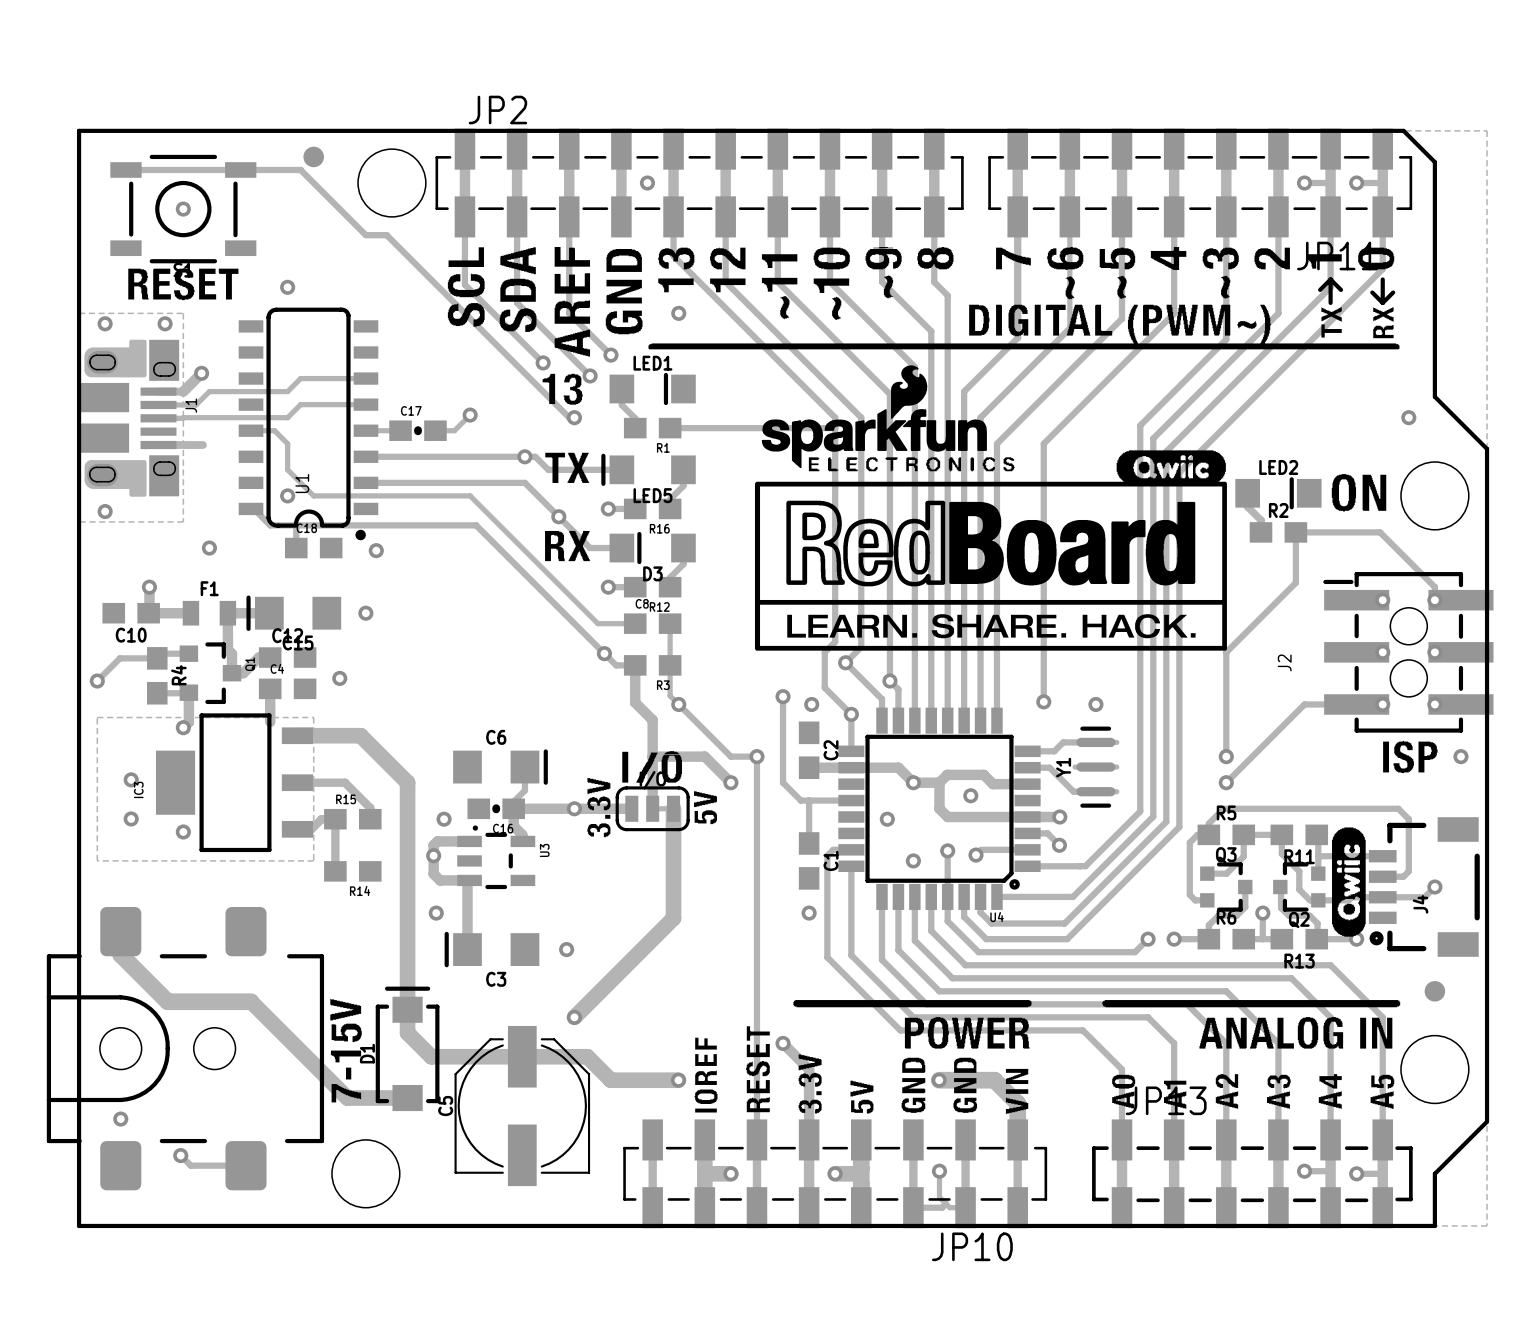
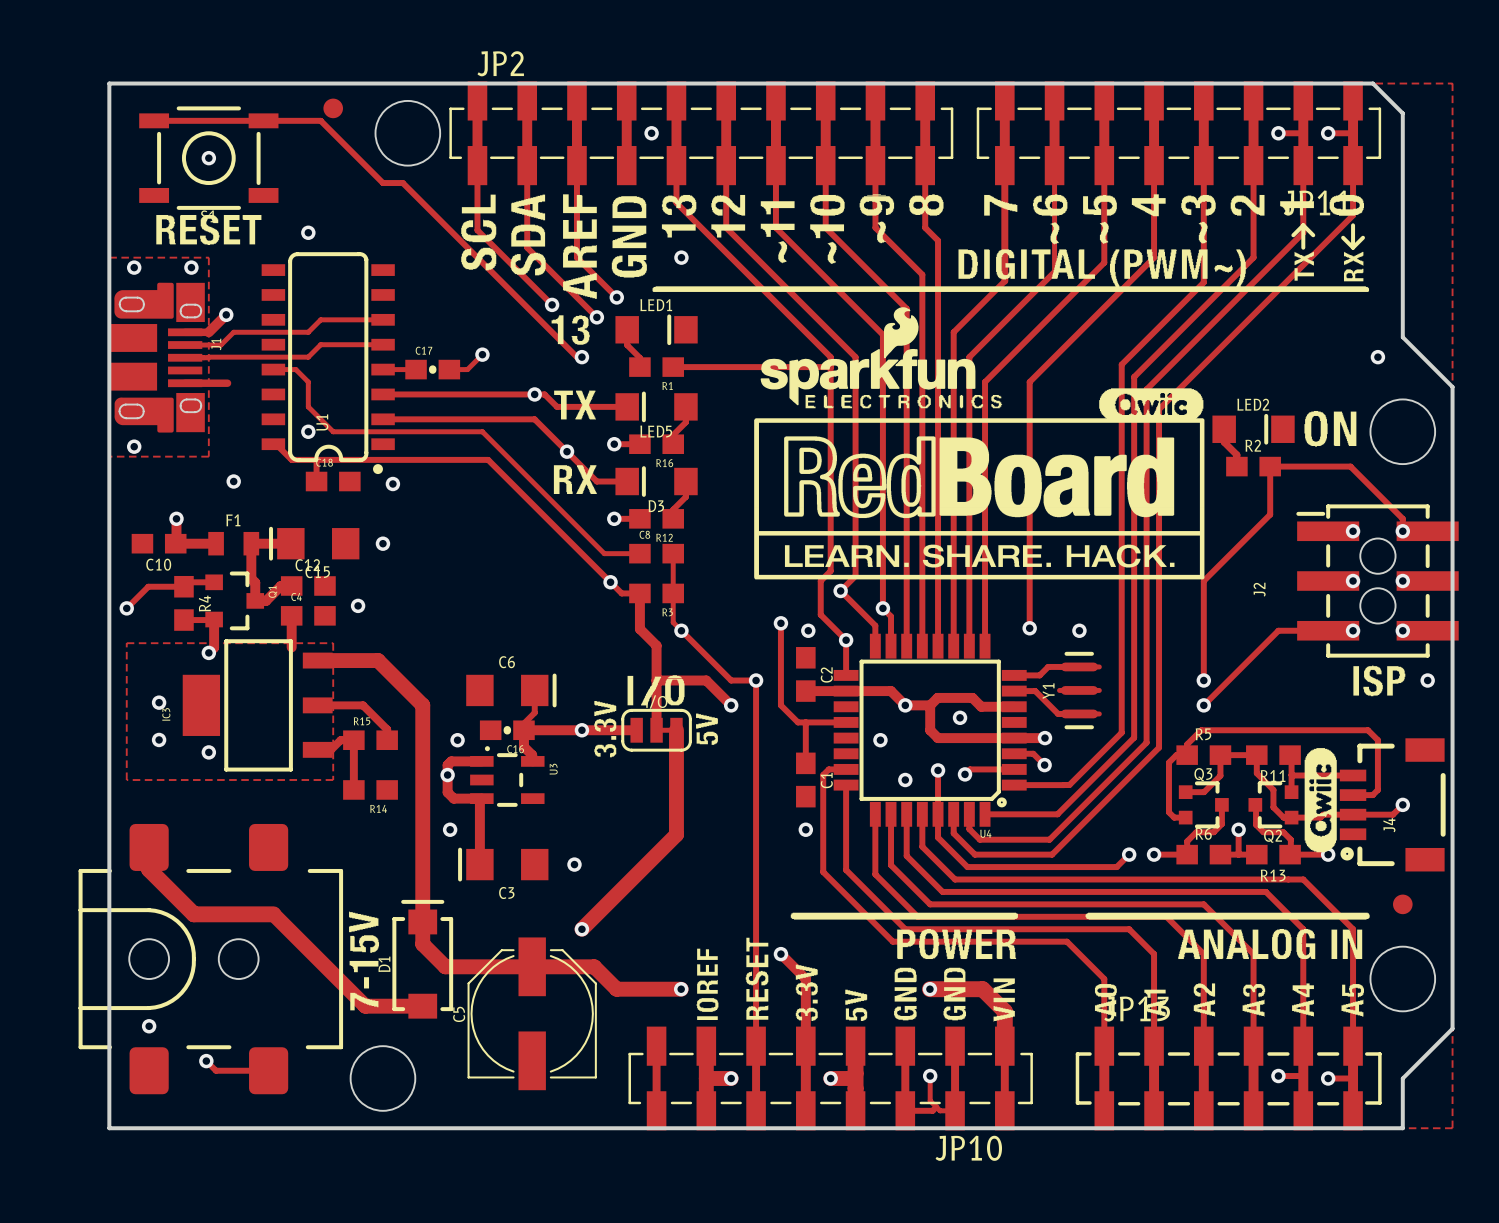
LED5 footprint: [601, 453, 696, 486] -> [615, 391, 698, 423]

